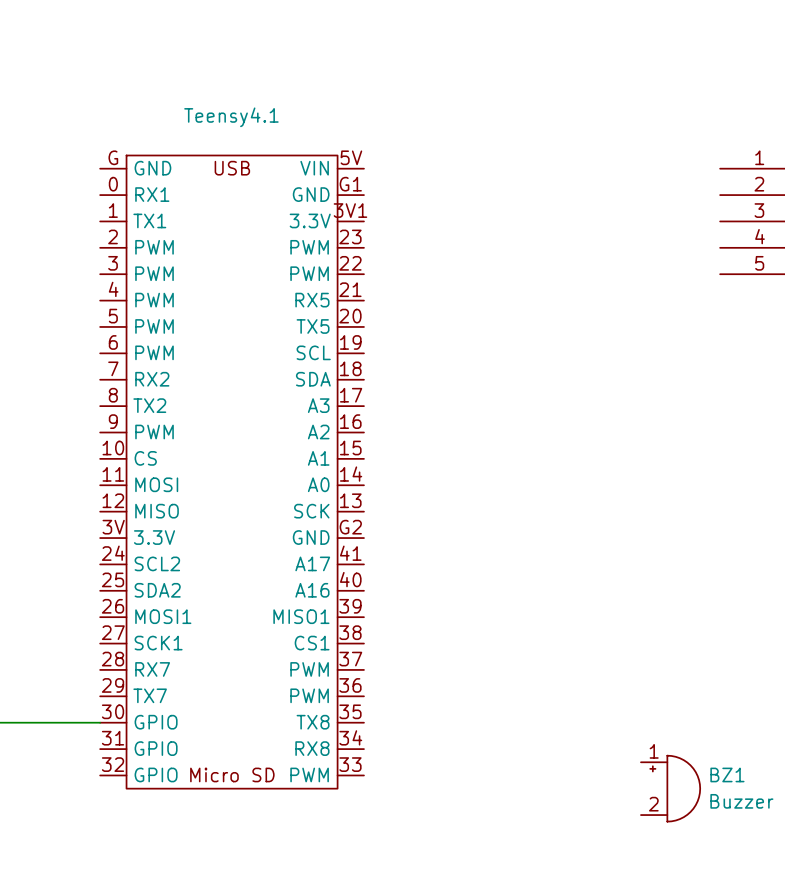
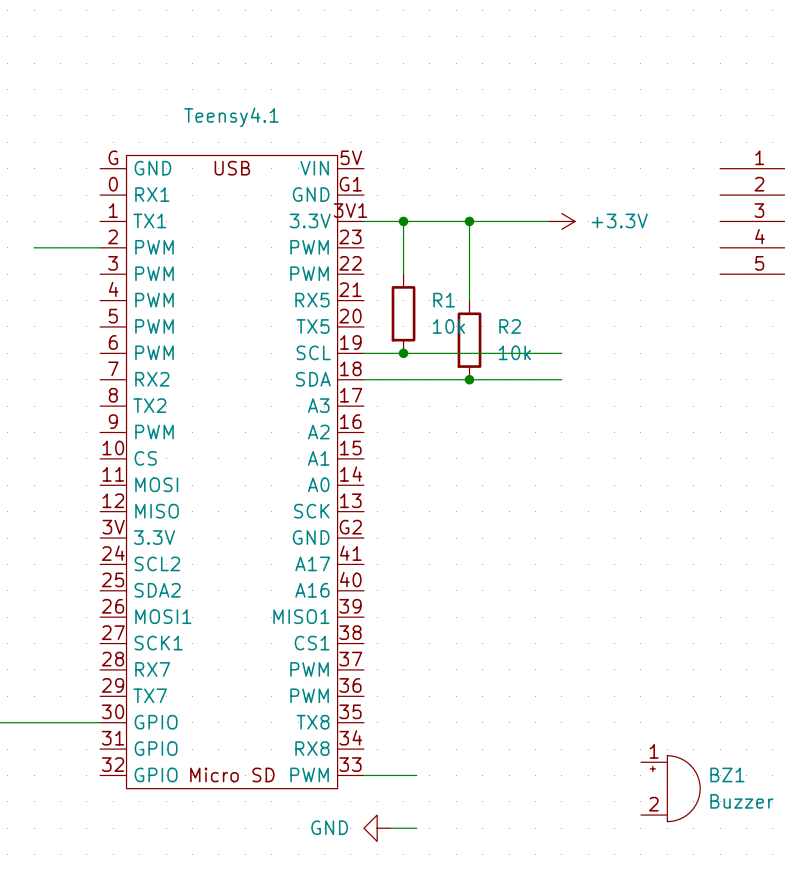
wire: none -> (363, 221) (548, 221)
wire: none -> (403, 221) (403, 274)
junction: none -> (403, 221)
wire: none -> (469, 221) (469, 300)
junction: none -> (469, 221)
power symbol: none -> +3.3V (561, 221)
wire: none -> (34, 247) (100, 247)
R1: none -> 10k (403, 313)
R2: none -> 10k (469, 340)
wire: none -> (363, 353) (561, 353)
junction: none -> (403, 353)
wire: none -> (363, 379) (561, 379)
junction: none -> (469, 379)
wire: none -> (363, 775) (416, 775)
power symbol: none -> GND (377, 828)
wire: none -> (390, 828) (416, 828)

